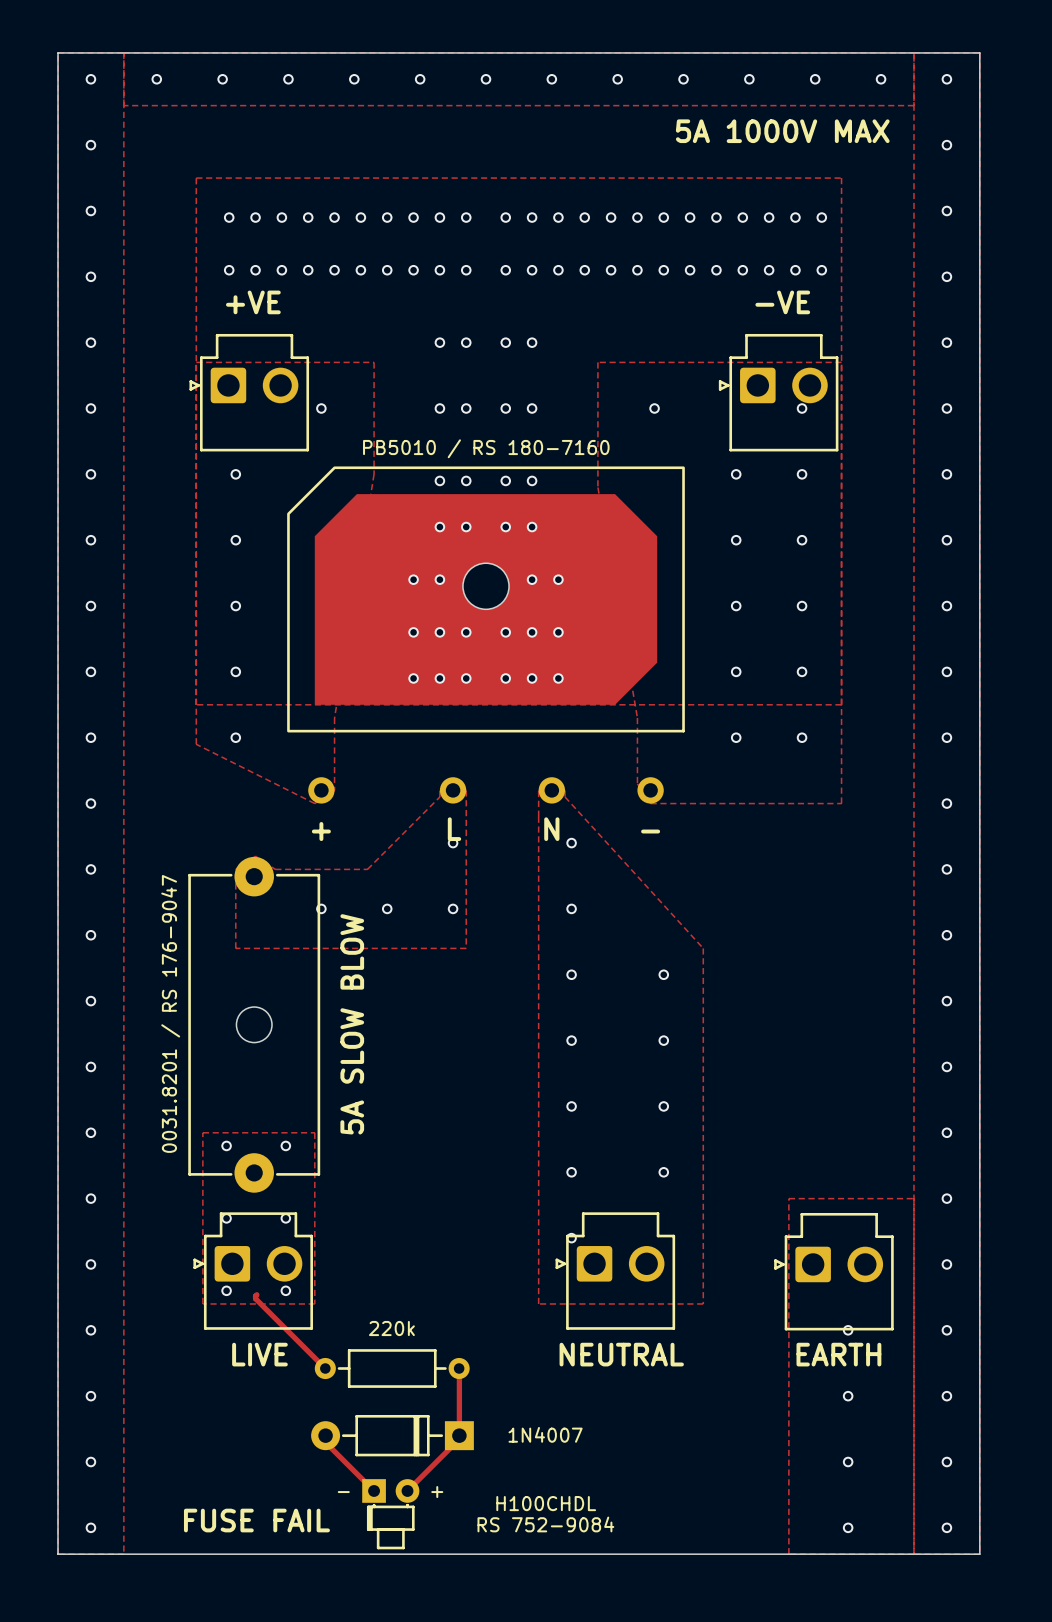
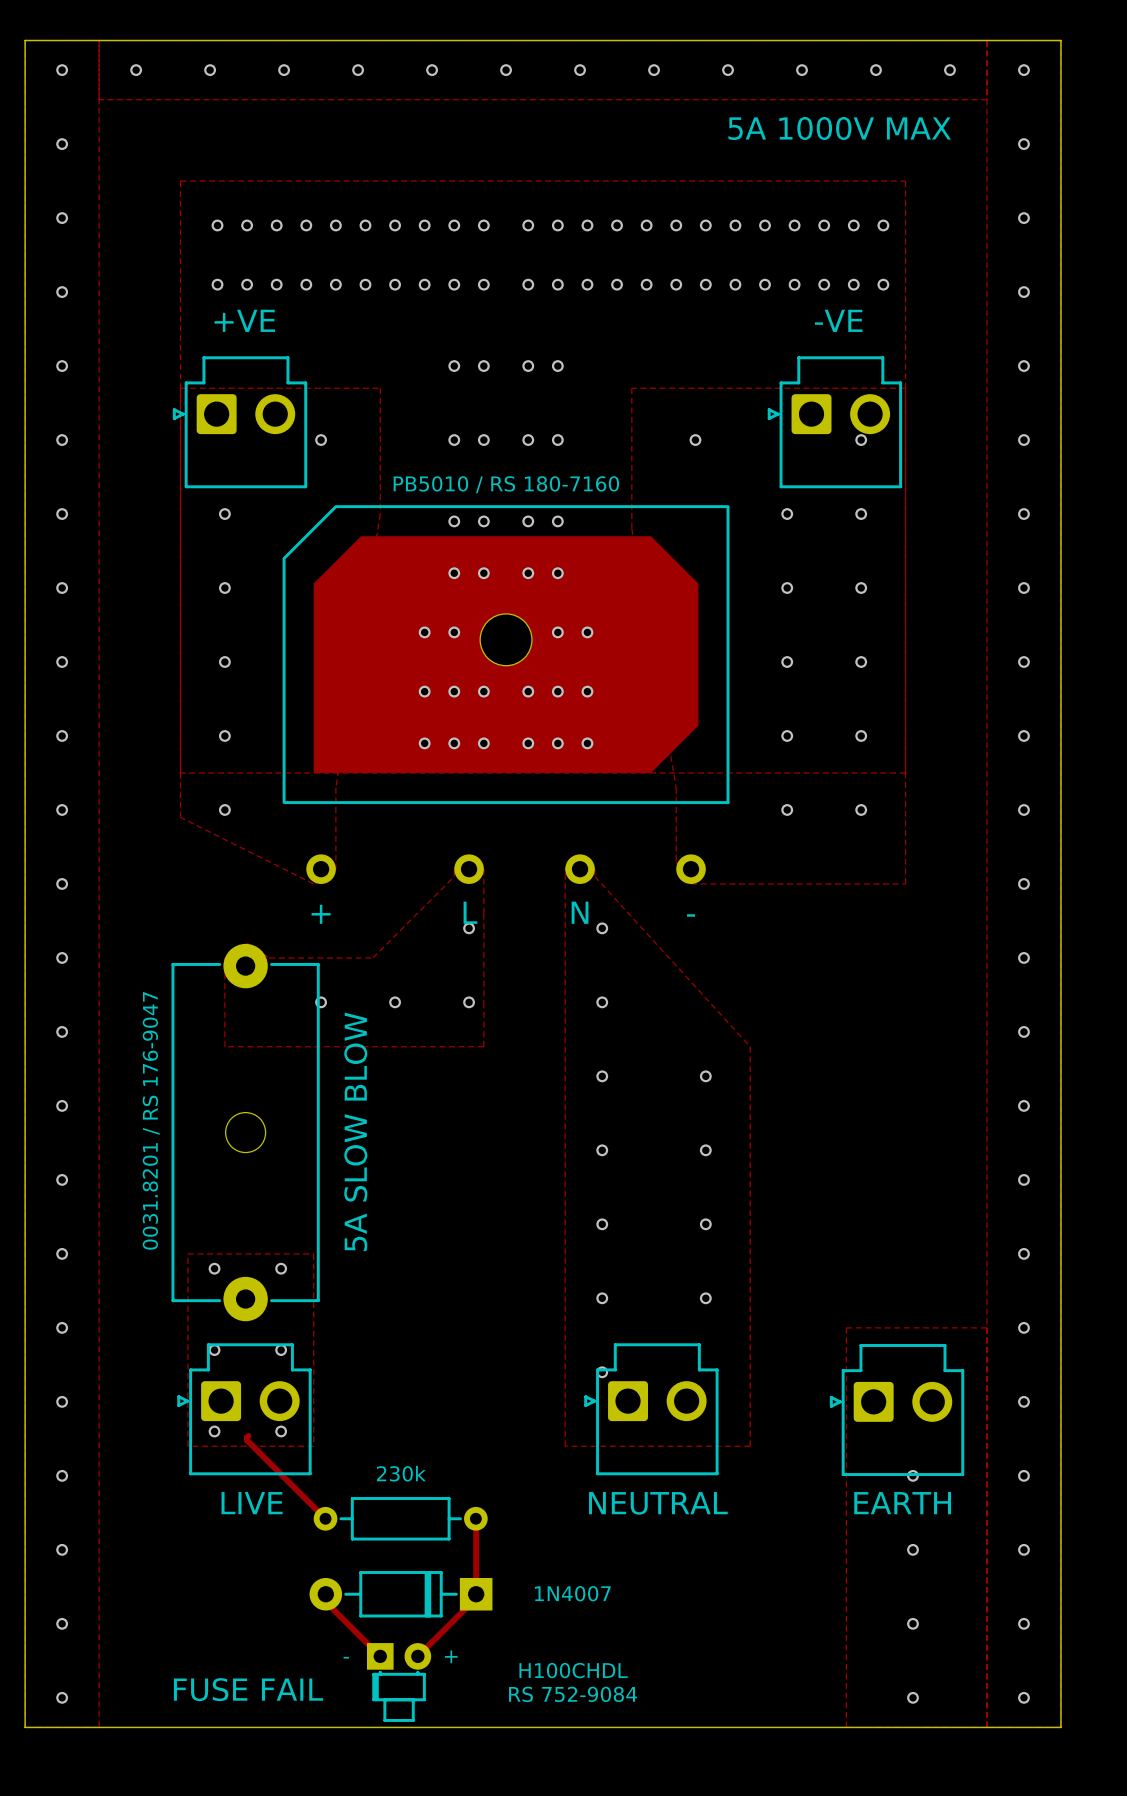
part value: 220k (391, 1328) -> 230k (401, 1473)

